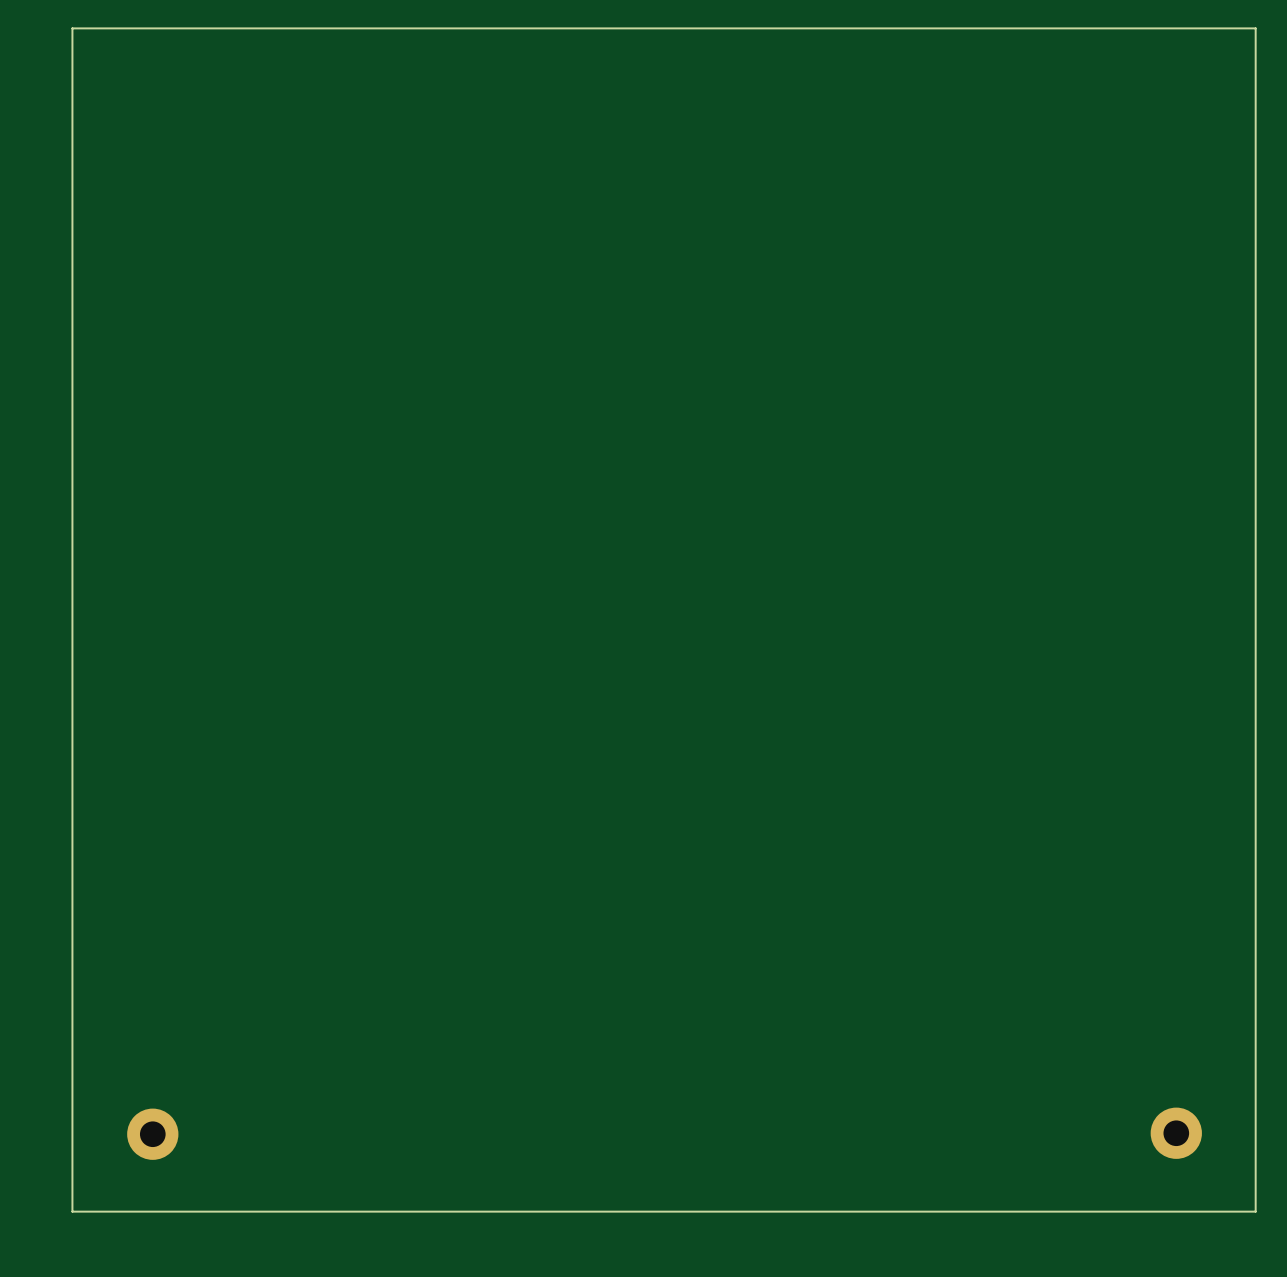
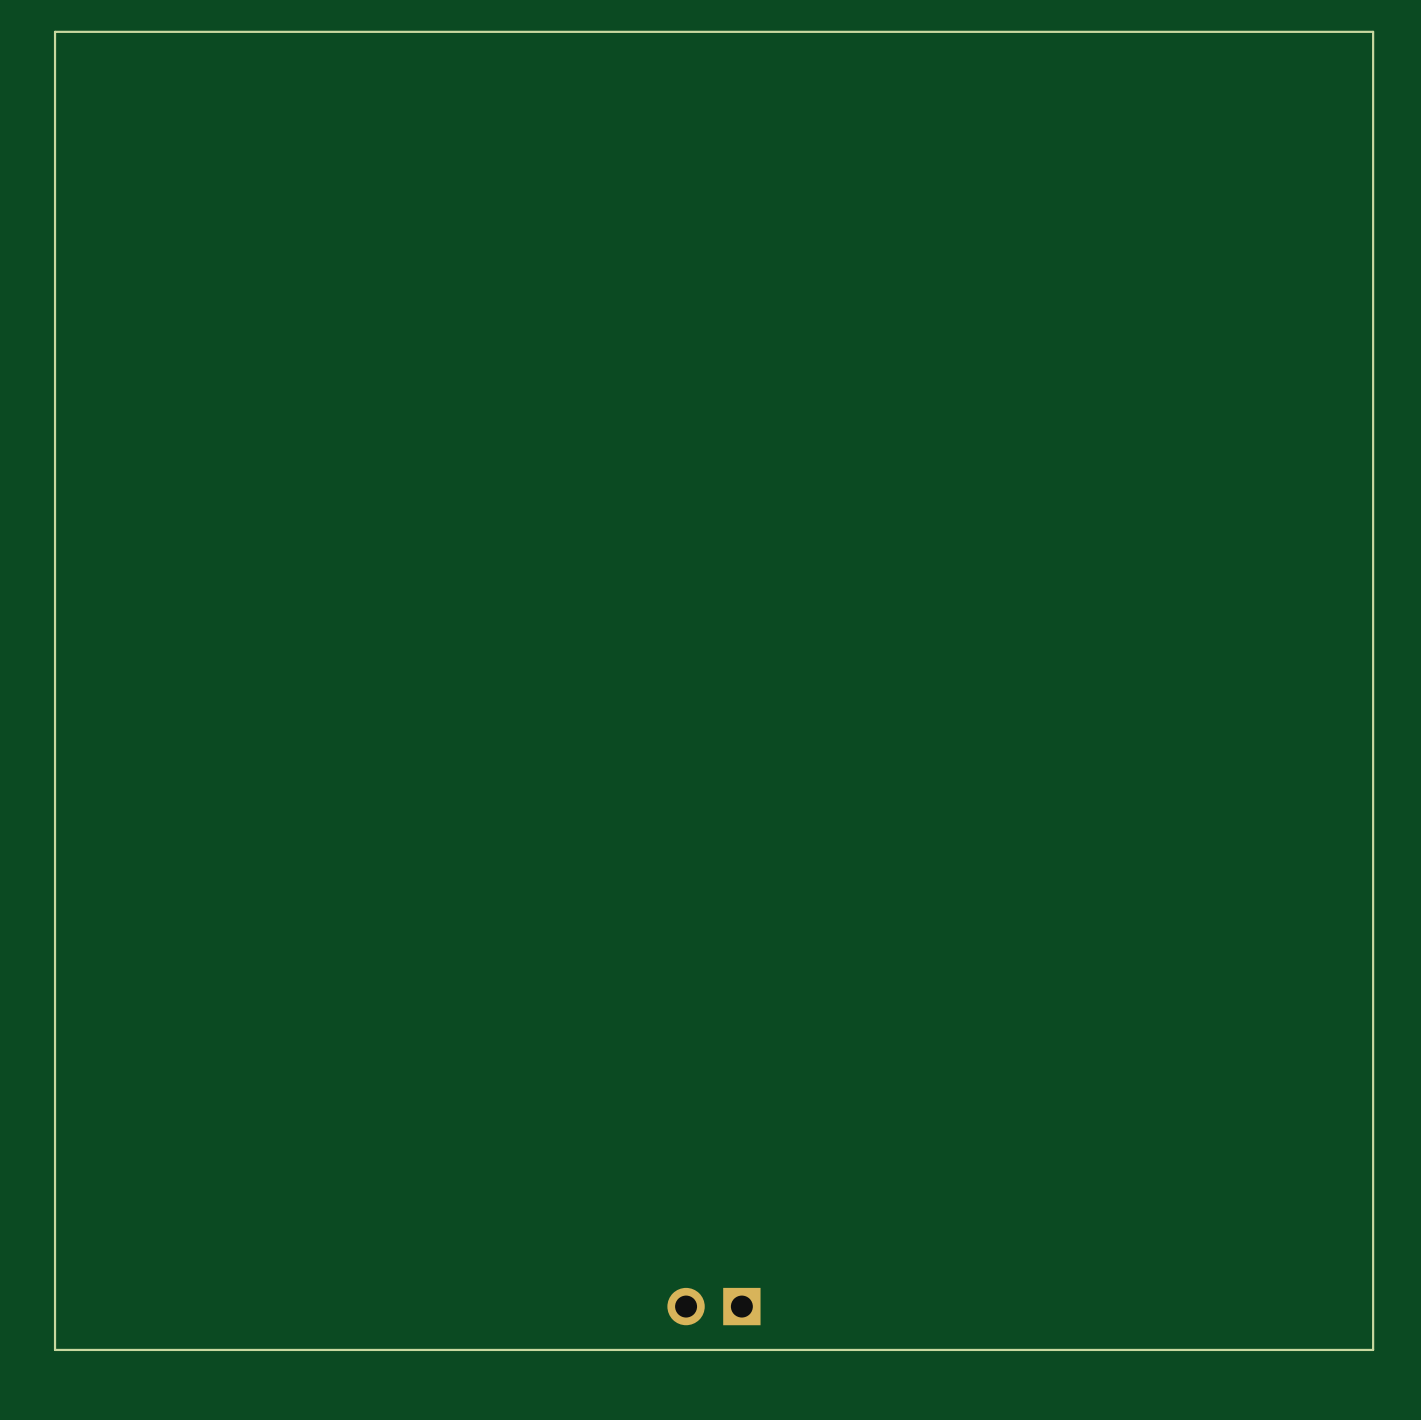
part: (1176, 1133) -> none
part: (152, 1134) -> none
part: none -> (713, 1306)

